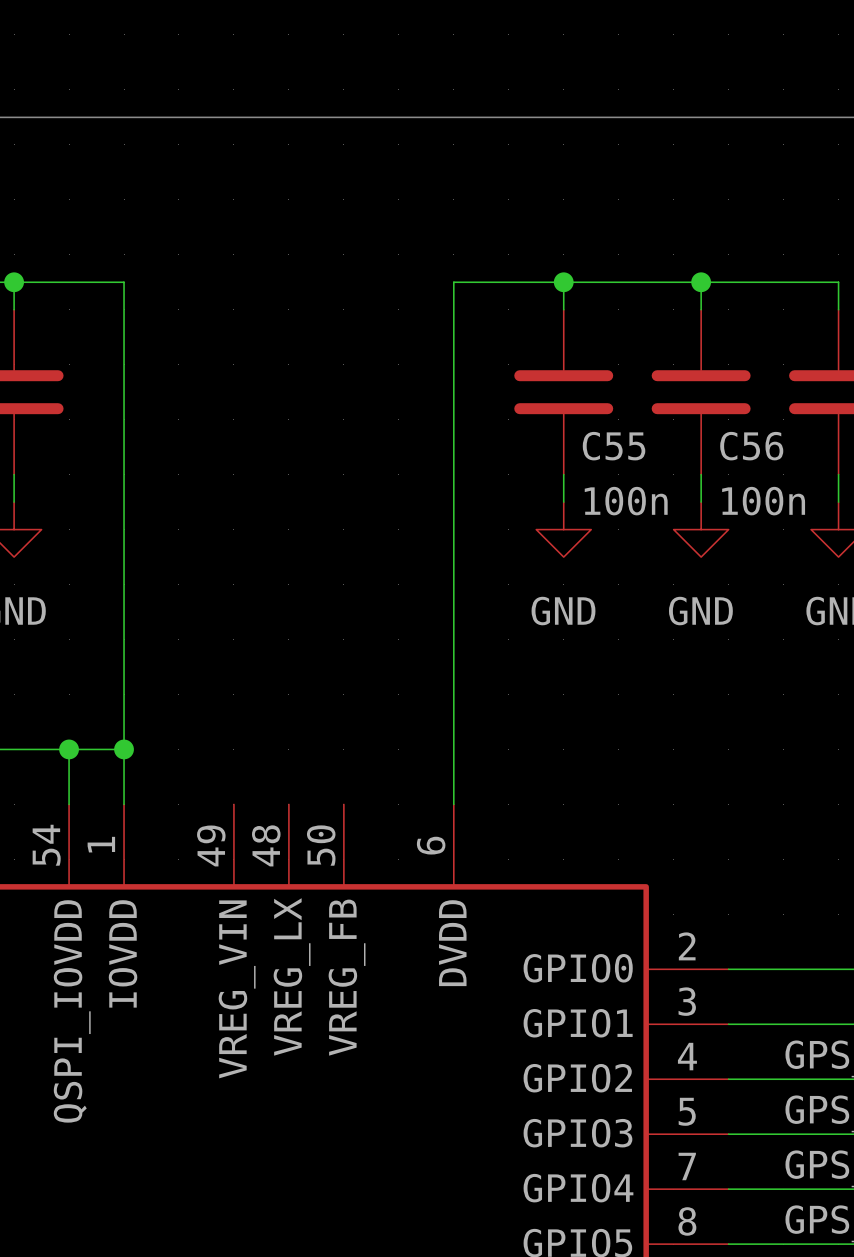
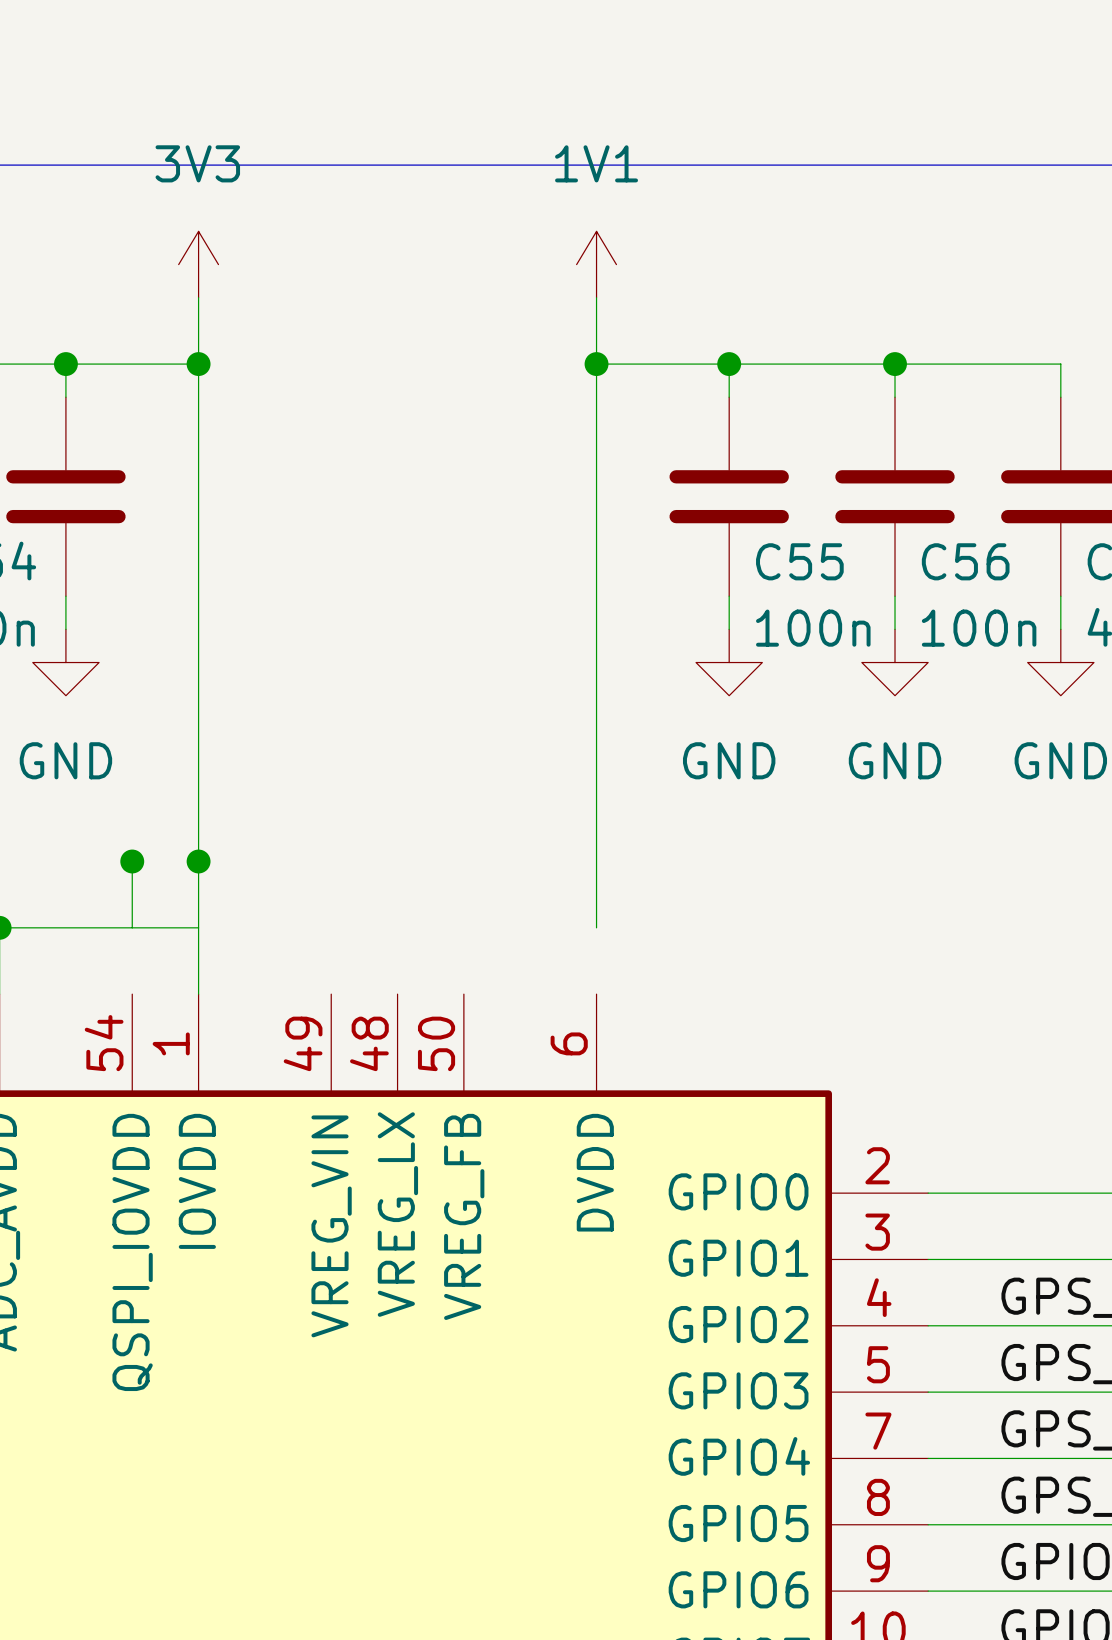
power symbol: none -> 3V3 (198, 264)
power symbol: none -> 1V1 (596, 264)
wire: none -> (198, 297) (198, 364)
junction: none -> (198, 364)
junction: none -> (596, 364)
junction: none -> (132, 861)
junction: none -> (198, 861)
wire: (69, 749) (69, 804) -> (132, 927) (132, 861)
junction: (69, 749) -> none
junction: (124, 749) -> none
wire: (453, 749) (453, 804) -> (596, 297) (596, 364)

